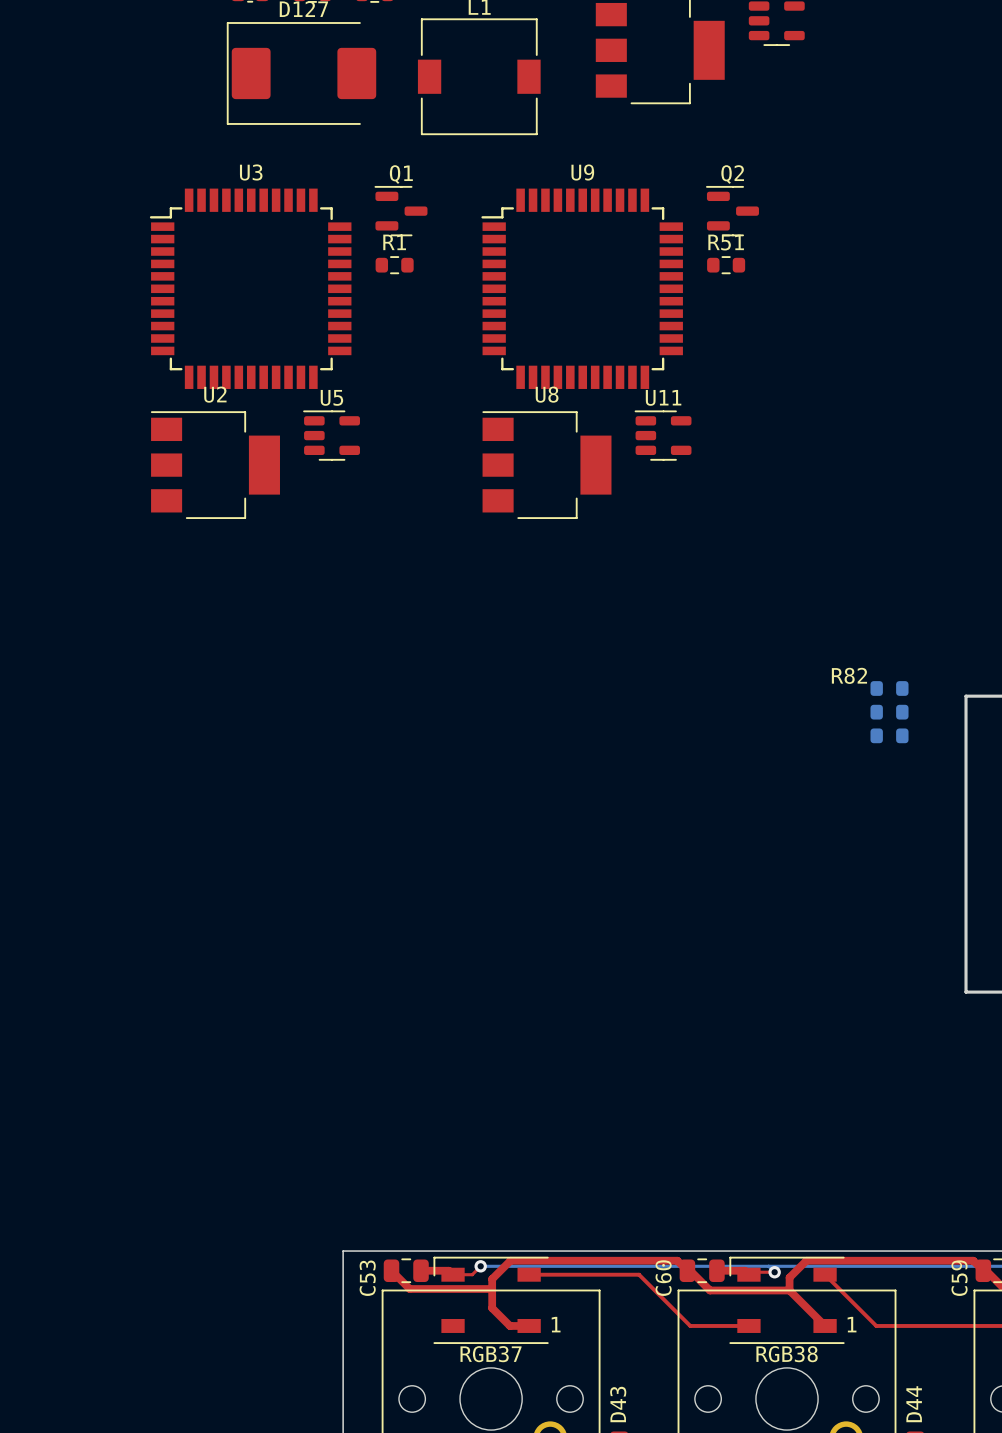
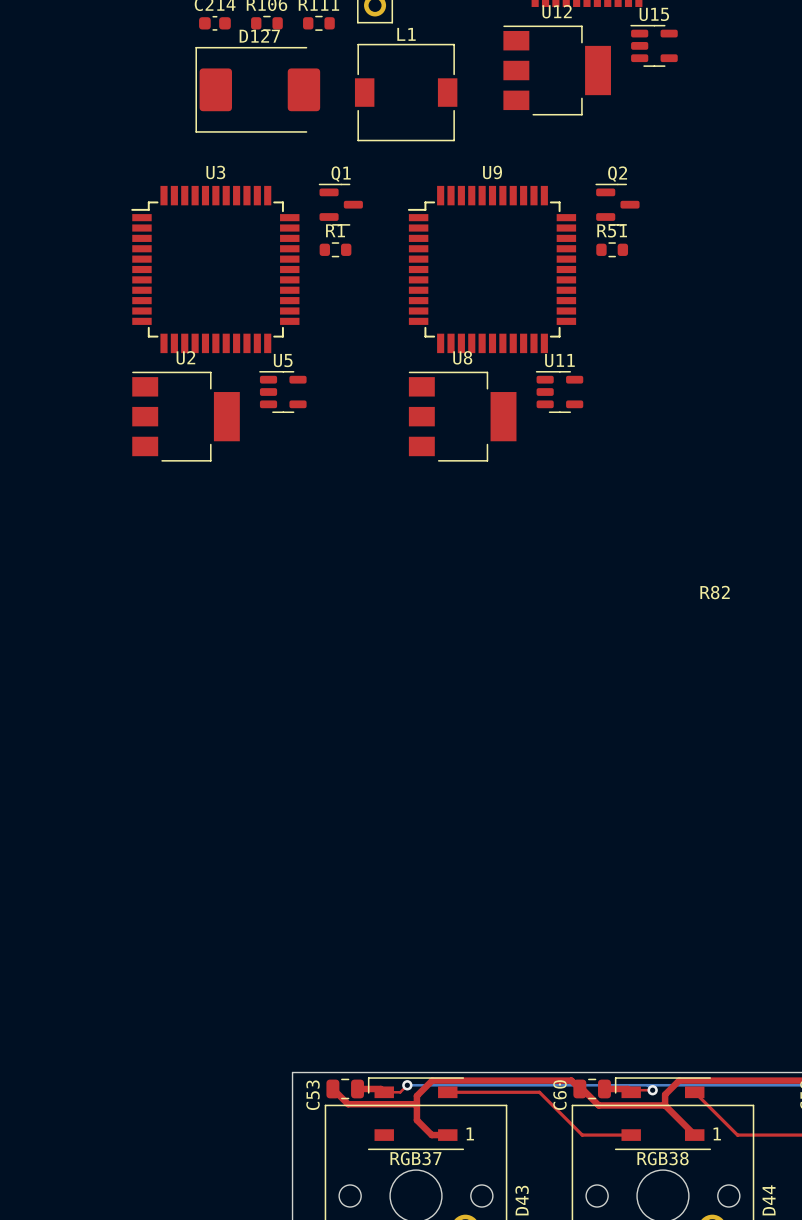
part: (889, 688) -> none
part: (889, 712) -> none
part: (889, 735) -> none

